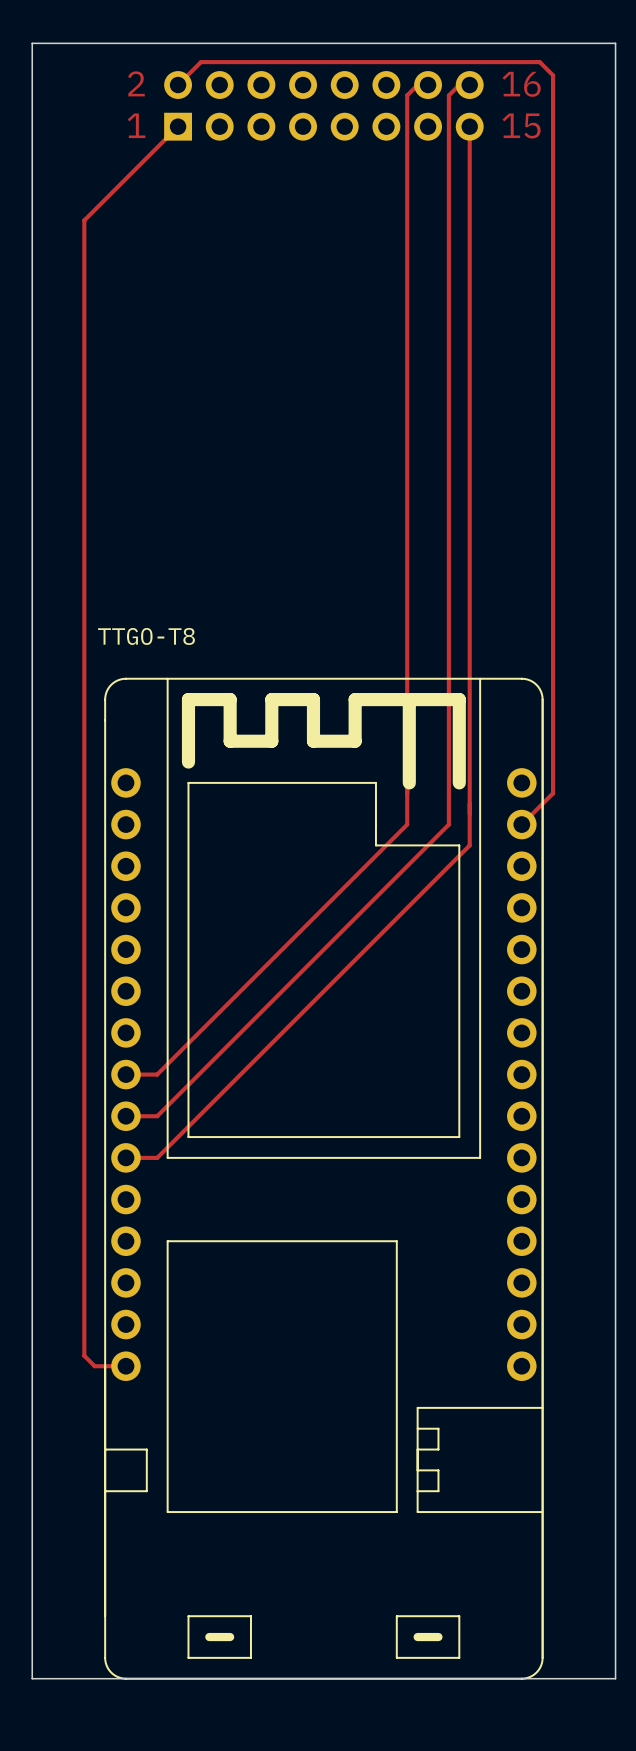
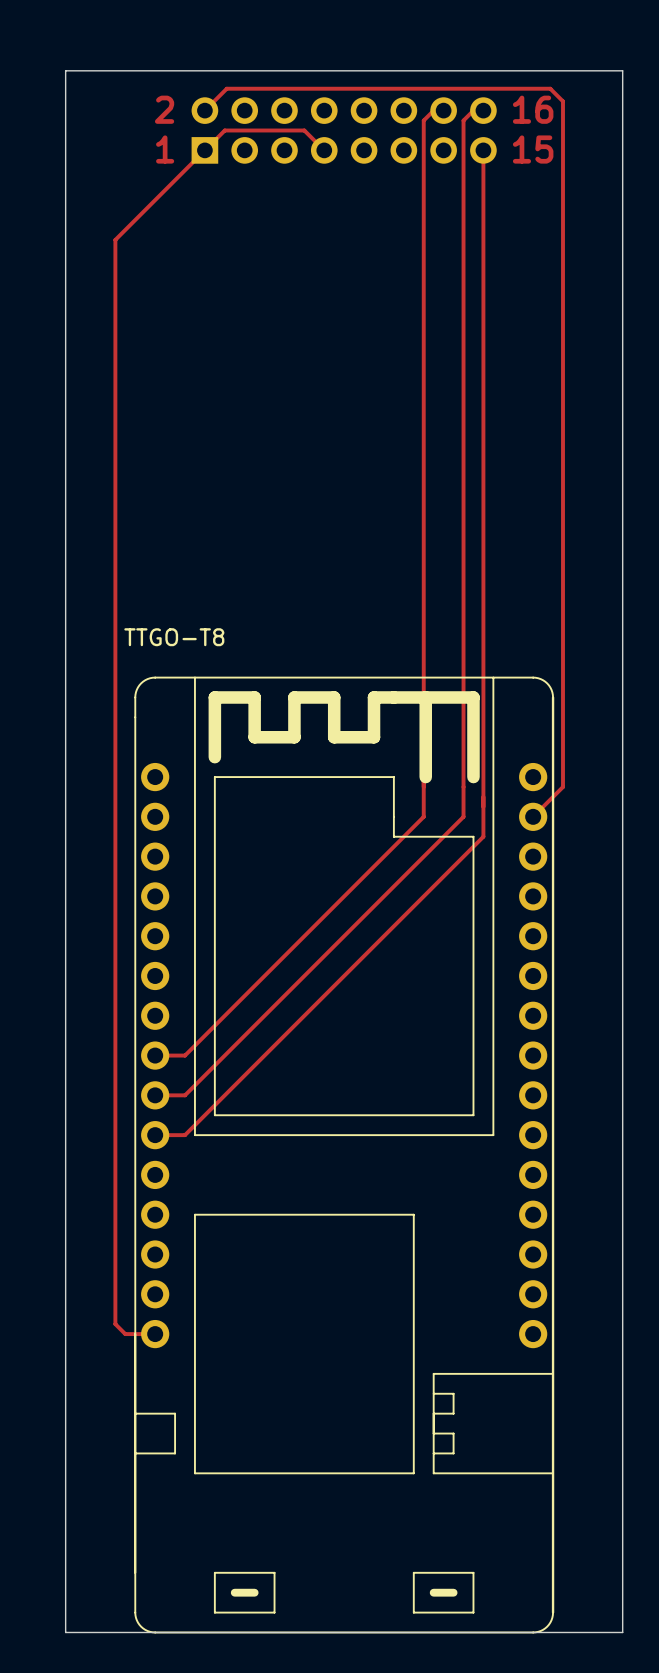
track: none -> (204, 150) (224, 130) (304, 130) (324, 150)

